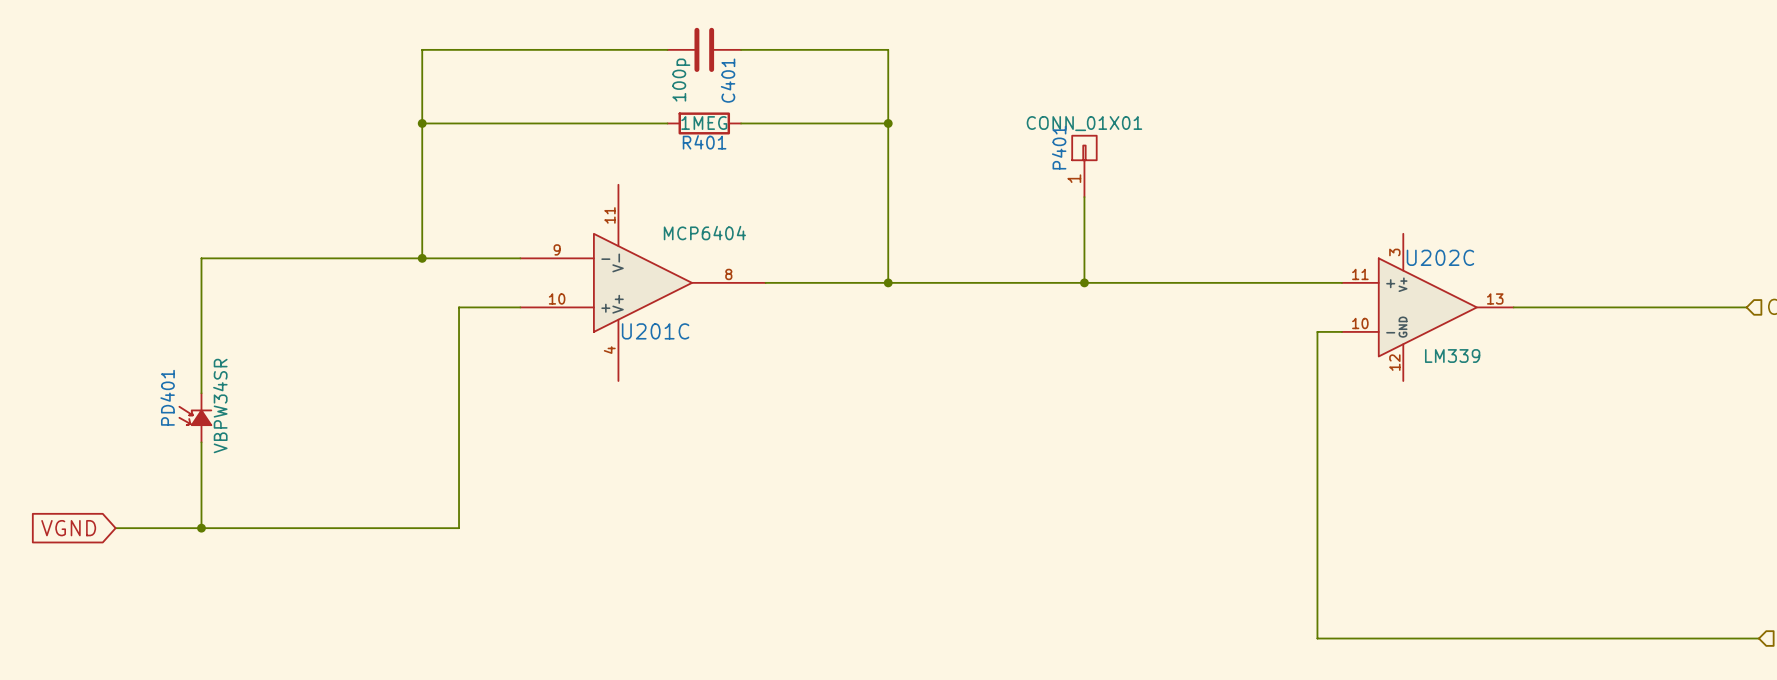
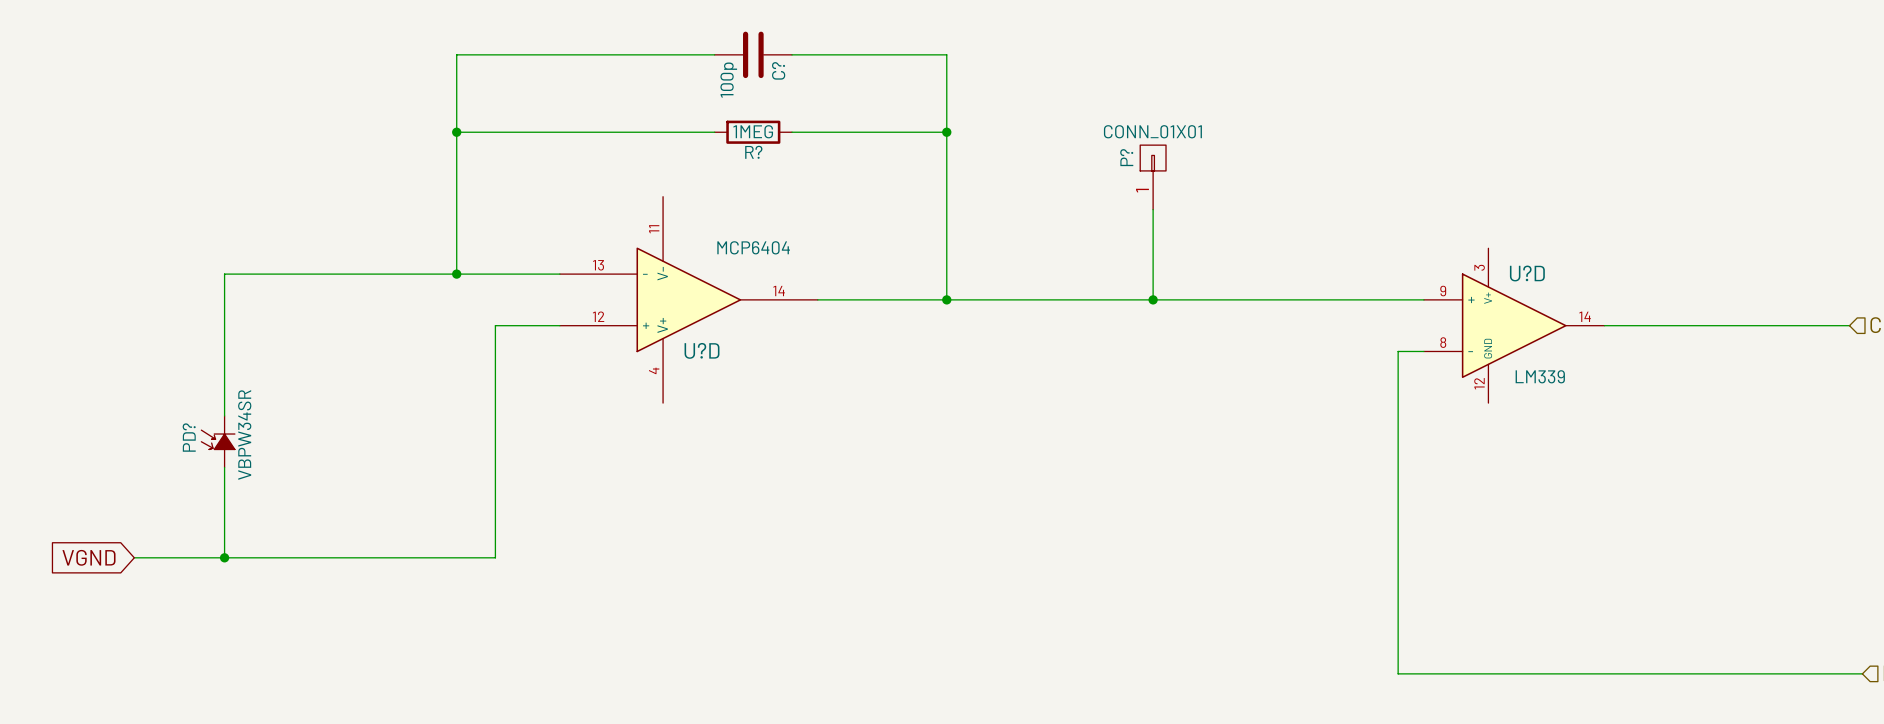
C401 name: C401 (728, 80) -> C? (778, 70)
R401 name: R401 (704, 142) -> R? (753, 152)
P401 name: P401 (1059, 147) -> P? (1126, 157)
U201C pin number: 9 (557, 249) -> 13 (598, 265)
U202C name: U202C (1440, 257) -> U?D (1527, 273)
U201C pin number: 8 (728, 274) -> 14 (779, 291)
U202C pin number: 11 (1360, 274) -> 9 (1443, 291)
U201C pin number: 10 (557, 298) -> 12 (598, 316)
U202C pin number: 13 (1495, 298) -> 14 (1585, 316)
U202C pin number: 10 (1360, 323) -> 8 (1443, 342)
U201C name: U201C (655, 331) -> U?D (702, 350)
PD401 name: PD401 (167, 397) -> PD? (189, 437)

